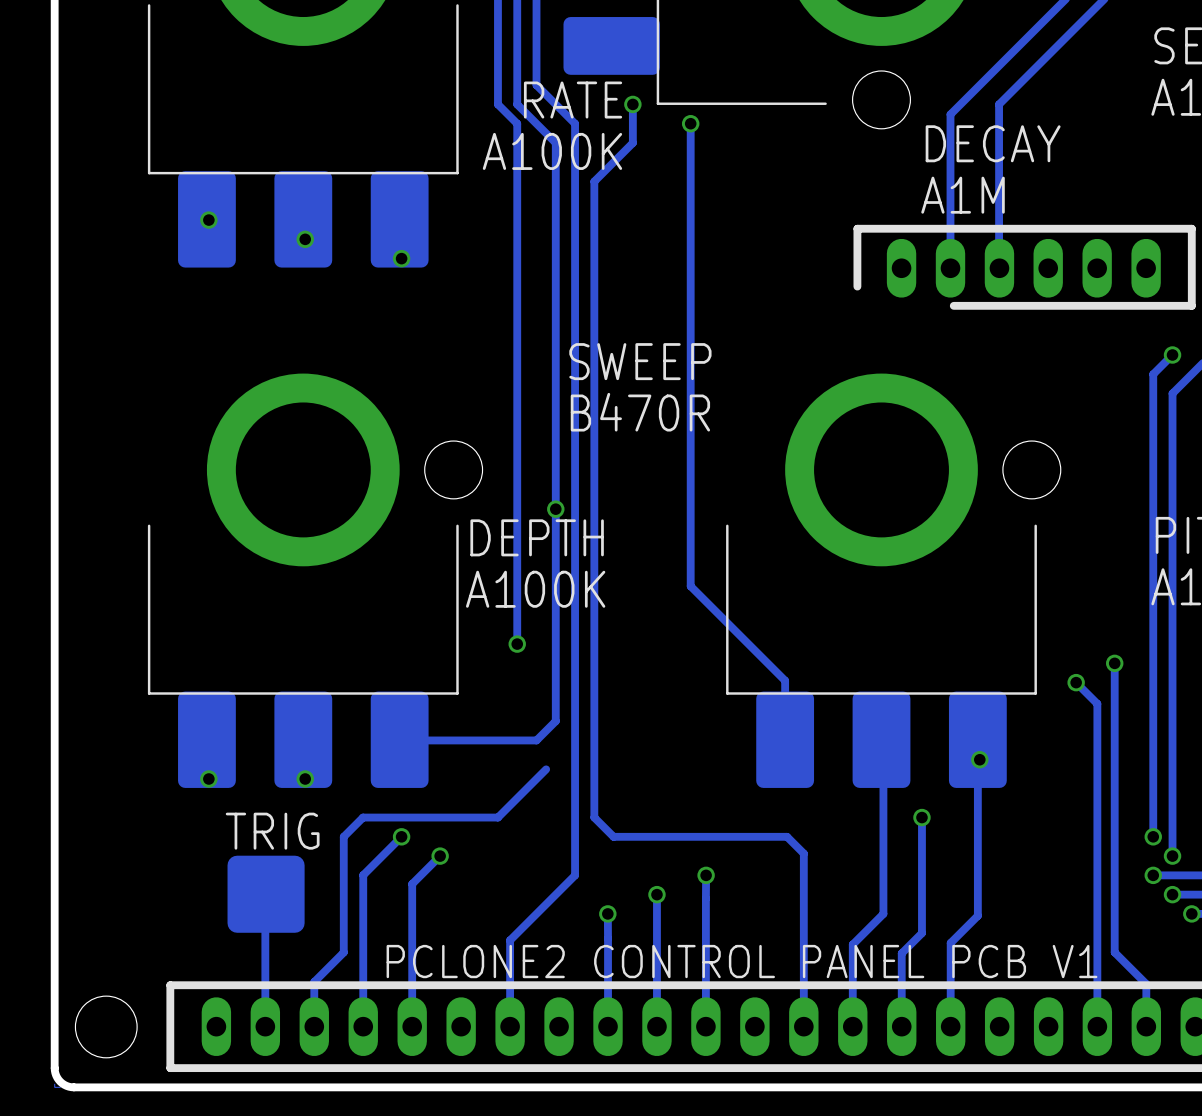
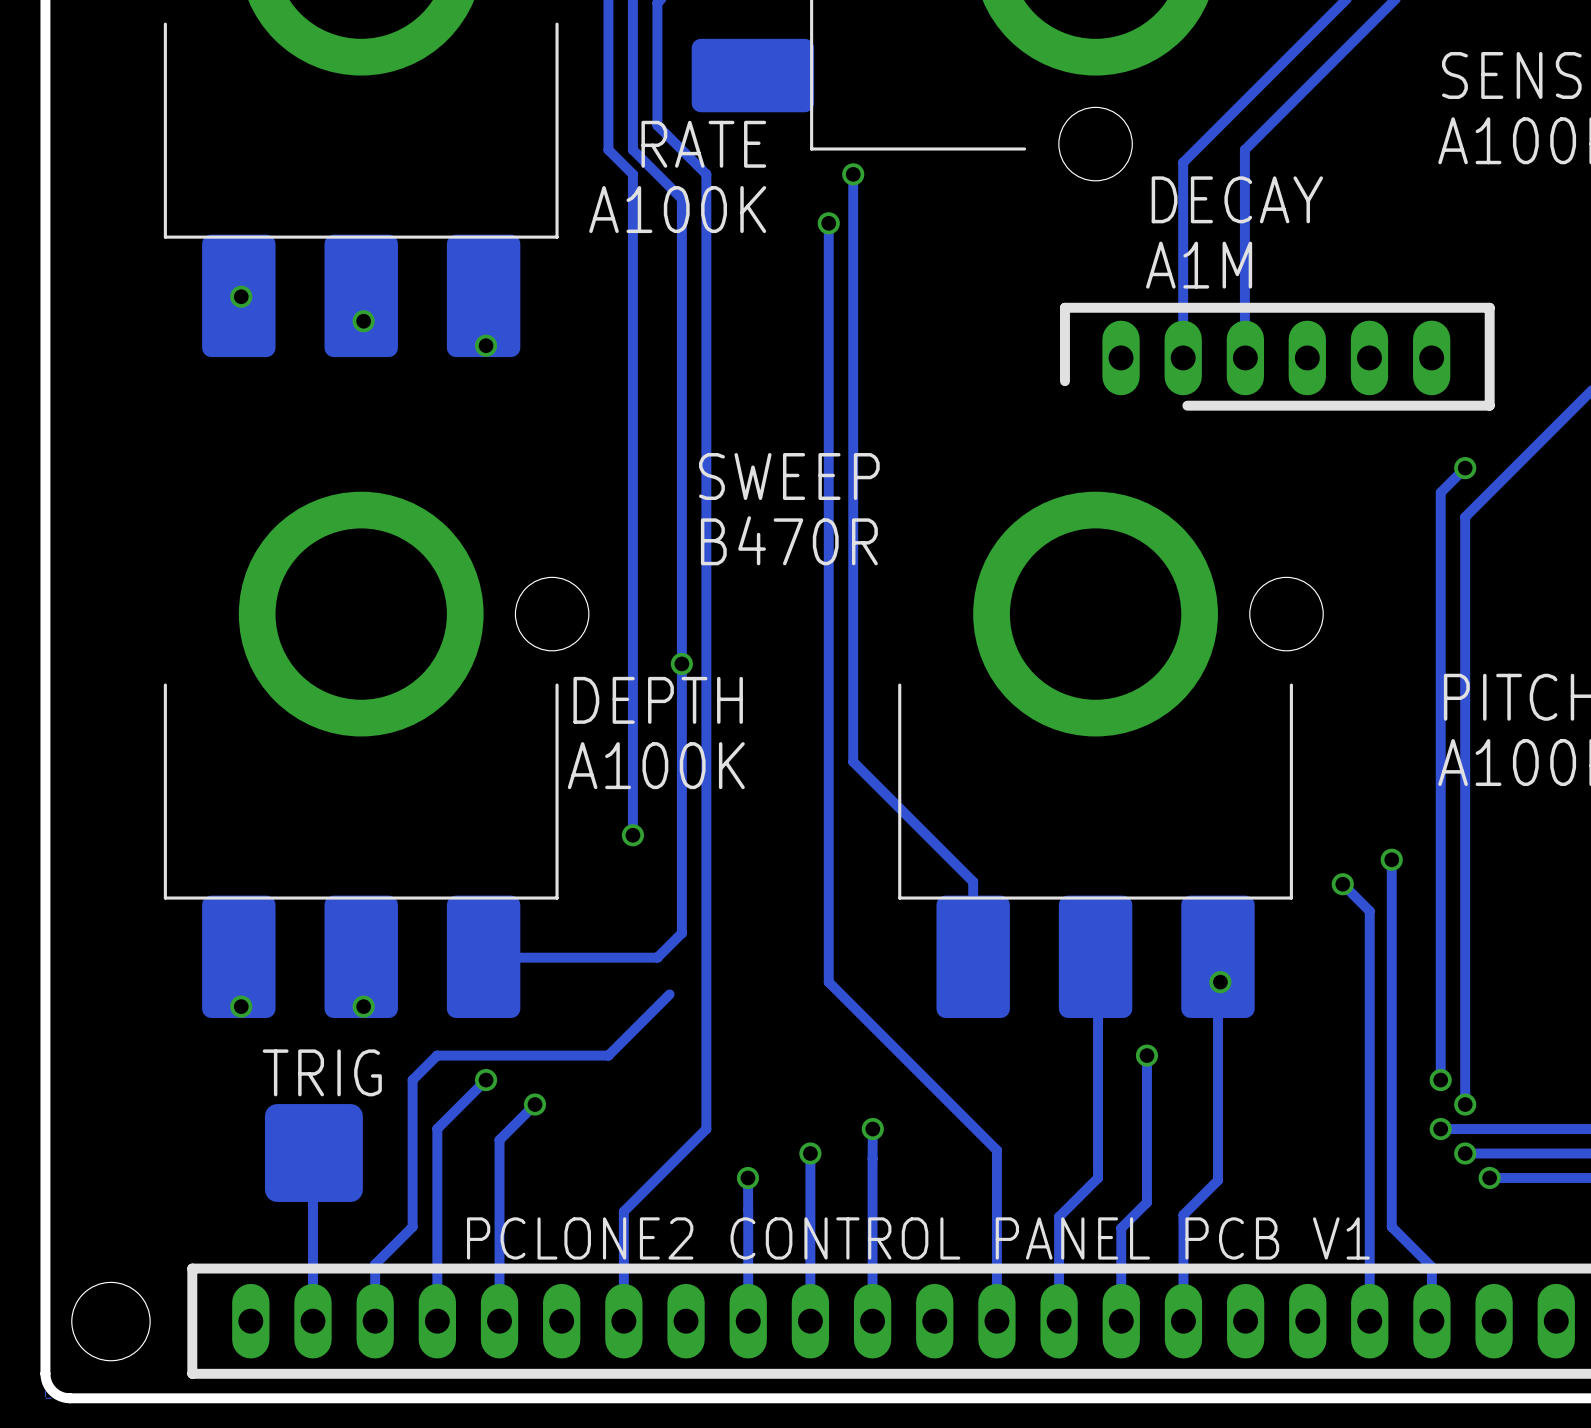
track: (632, 104) (632, 142) (594, 181) (594, 817) (613, 836) (787, 836) (803, 853) (803, 892) -> (828, 223) (828, 982) (996, 1150)
via position: (632, 104) -> (828, 223)

